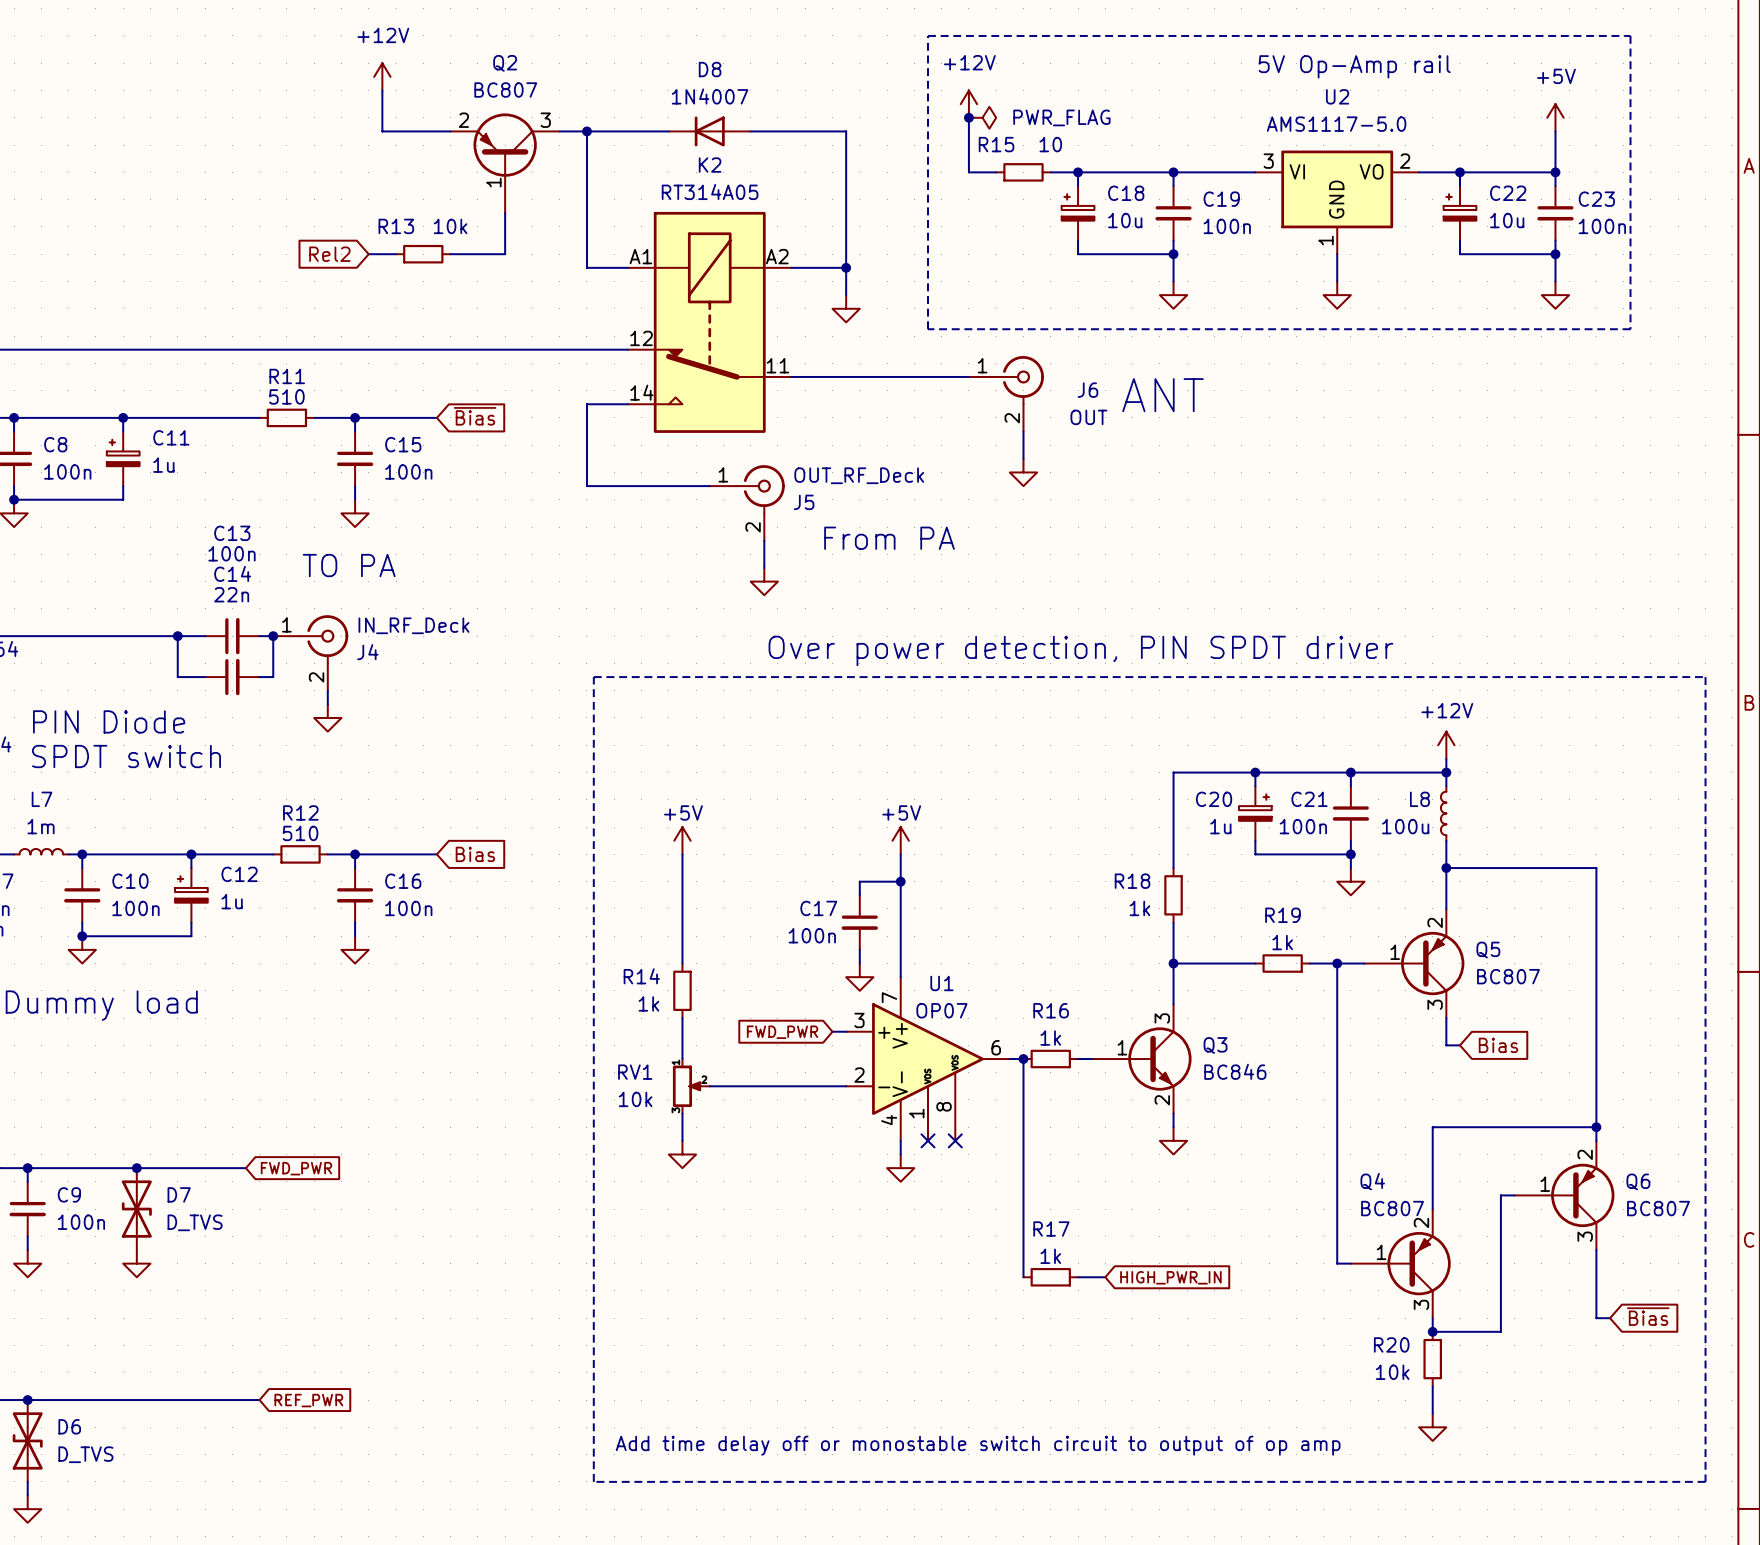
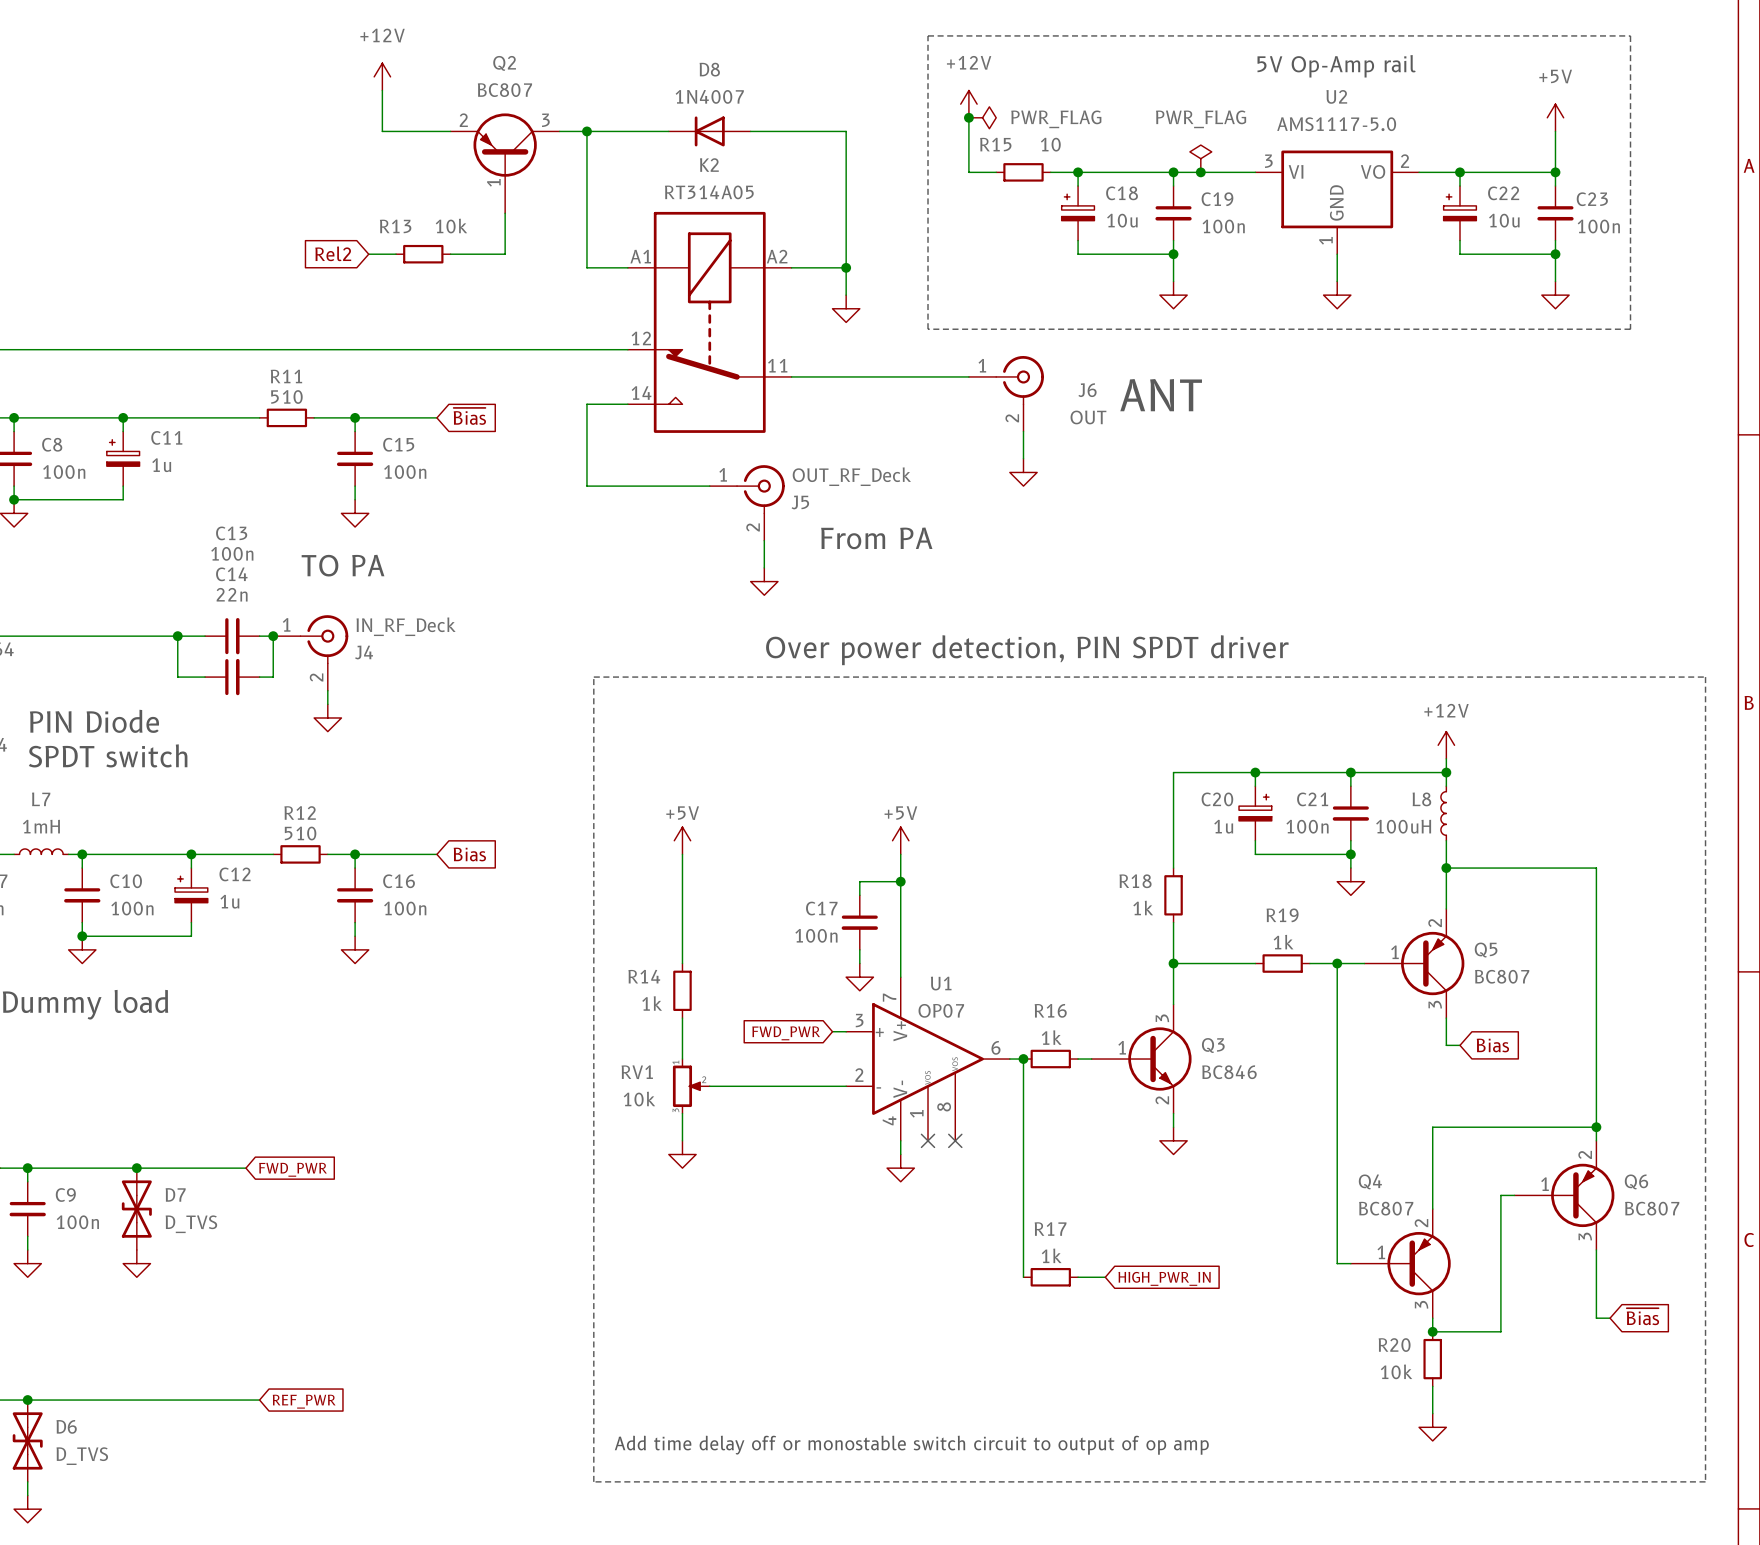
power symbol: none -> PWR_FLAG (1200, 158)
junction: none -> (1200, 172)
L7 value: 1m (41, 826) -> 1mH (41, 826)
L8 value: 100u (1405, 826) -> 100uH (1403, 826)

